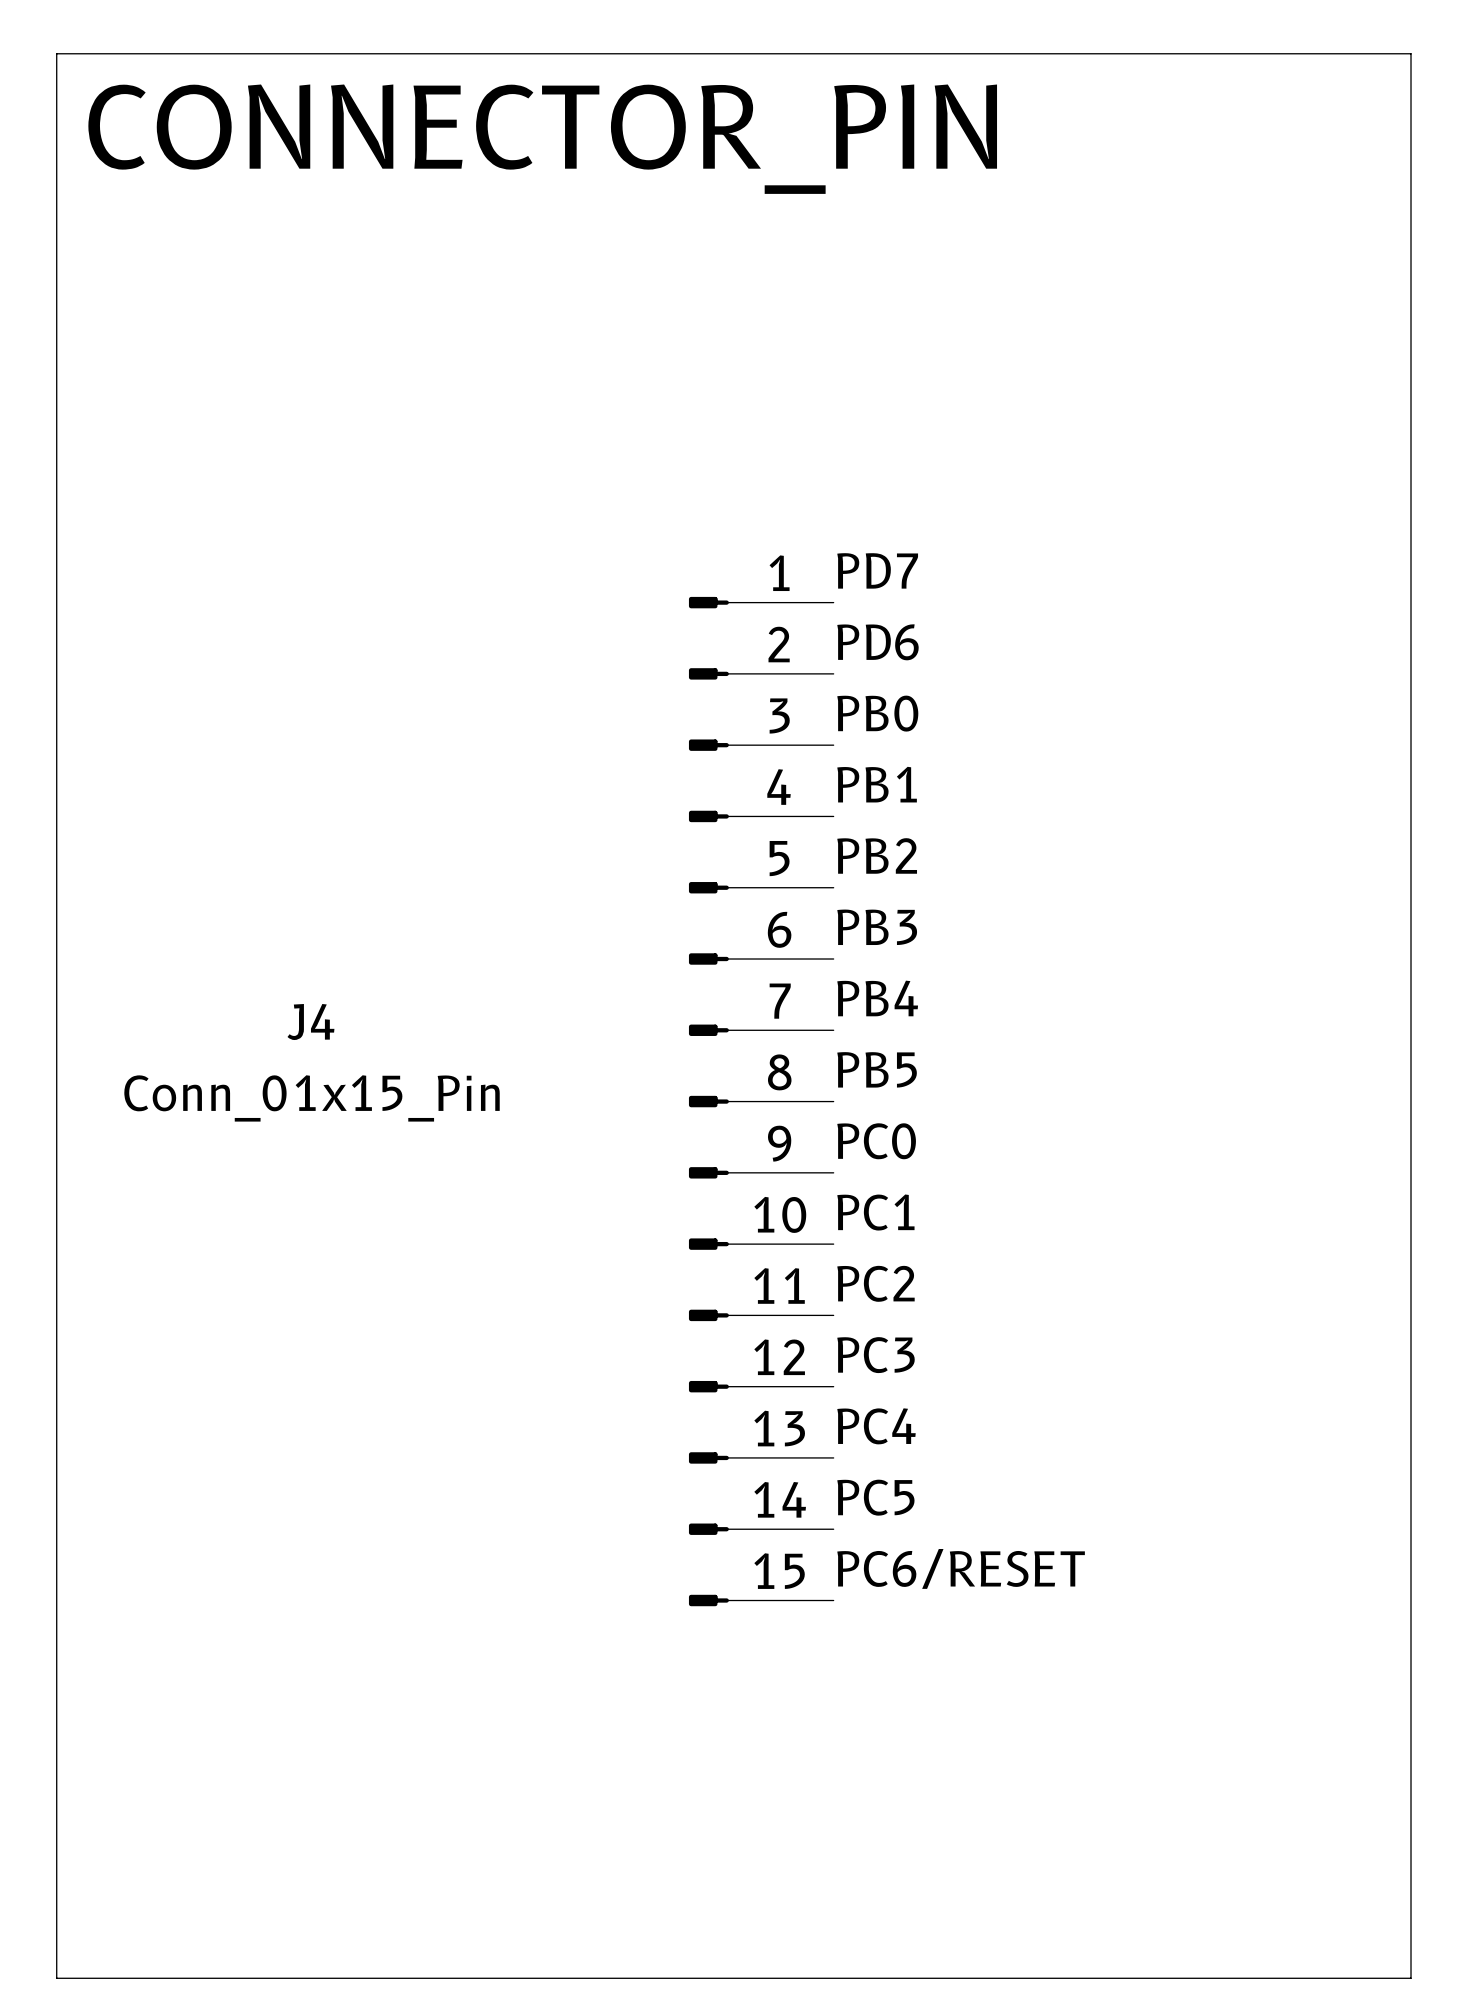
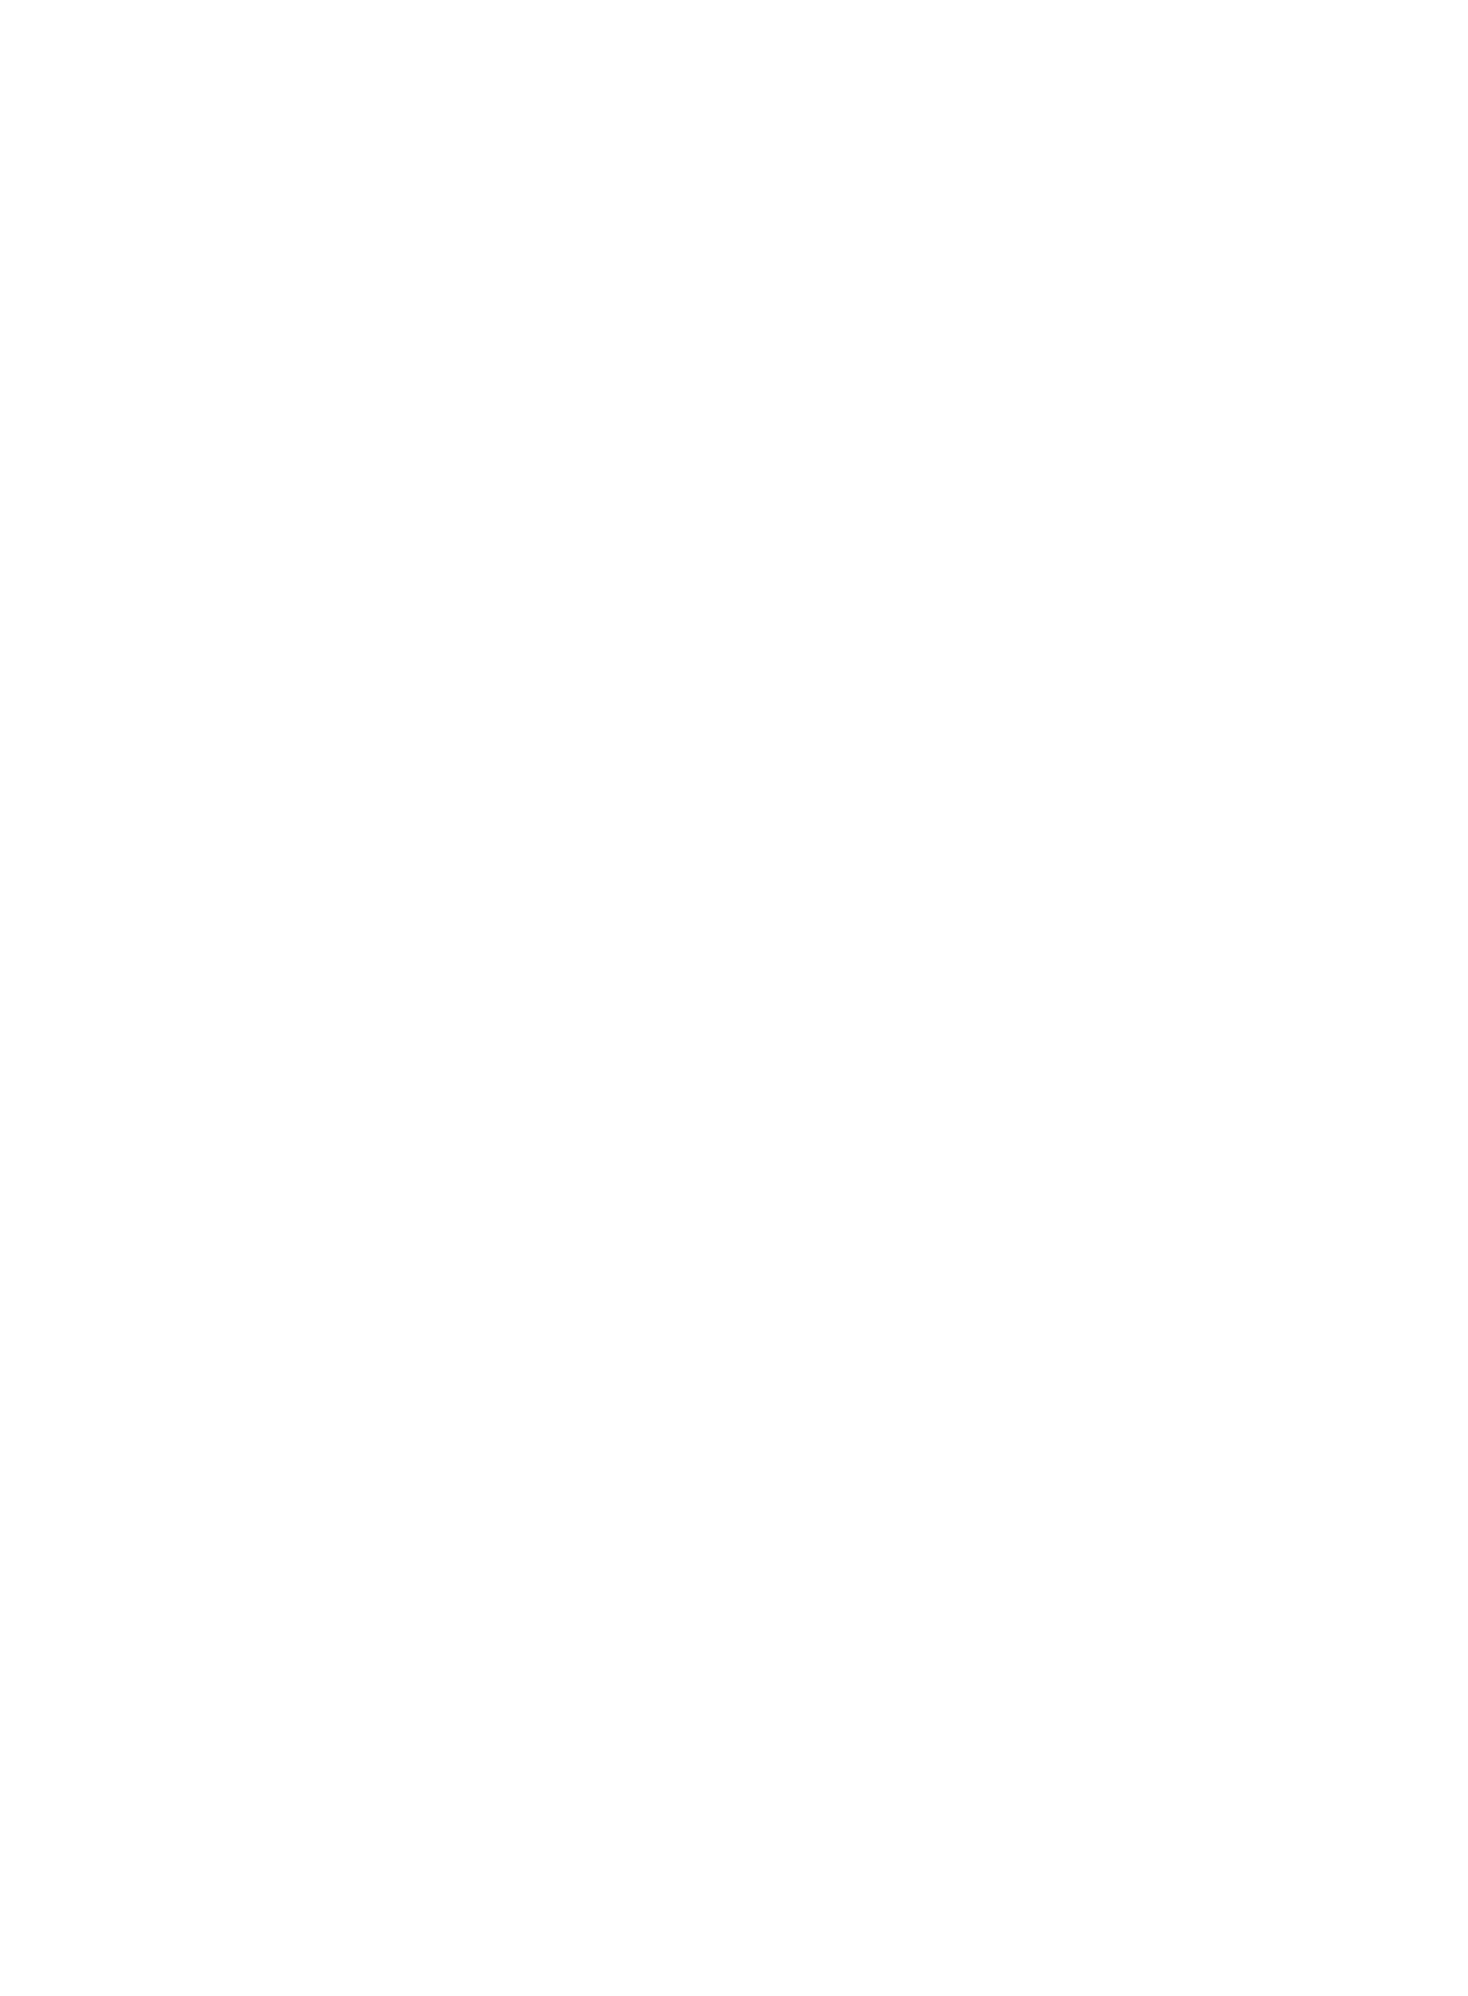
line: (56, 53) (1411, 53) (1411, 1978) (56, 1978) (56, 53) -> none
text: CONNECTOR_PIN (542, 139) -> none
label: PD7 (877, 570) -> none
label: PD6 (877, 642) -> none
label: PB0 (877, 713) -> none
label: PB1 (877, 784) -> none
label: PB2 (877, 855) -> none
label: PB3 (877, 927) -> none
label: PB4 (877, 998) -> none
label: PB5 (877, 1069) -> none
J4: Conn_01x15_Pin (761, 1101) -> none
label: PC0 (876, 1141) -> none
label: PC1 (875, 1212) -> none
label: PC2 (875, 1283) -> none
label: PC3 (876, 1355) -> none
label: PC4 (876, 1426) -> none
label: PC5 (875, 1497) -> none
label: PC6/RESET (961, 1568) -> none

